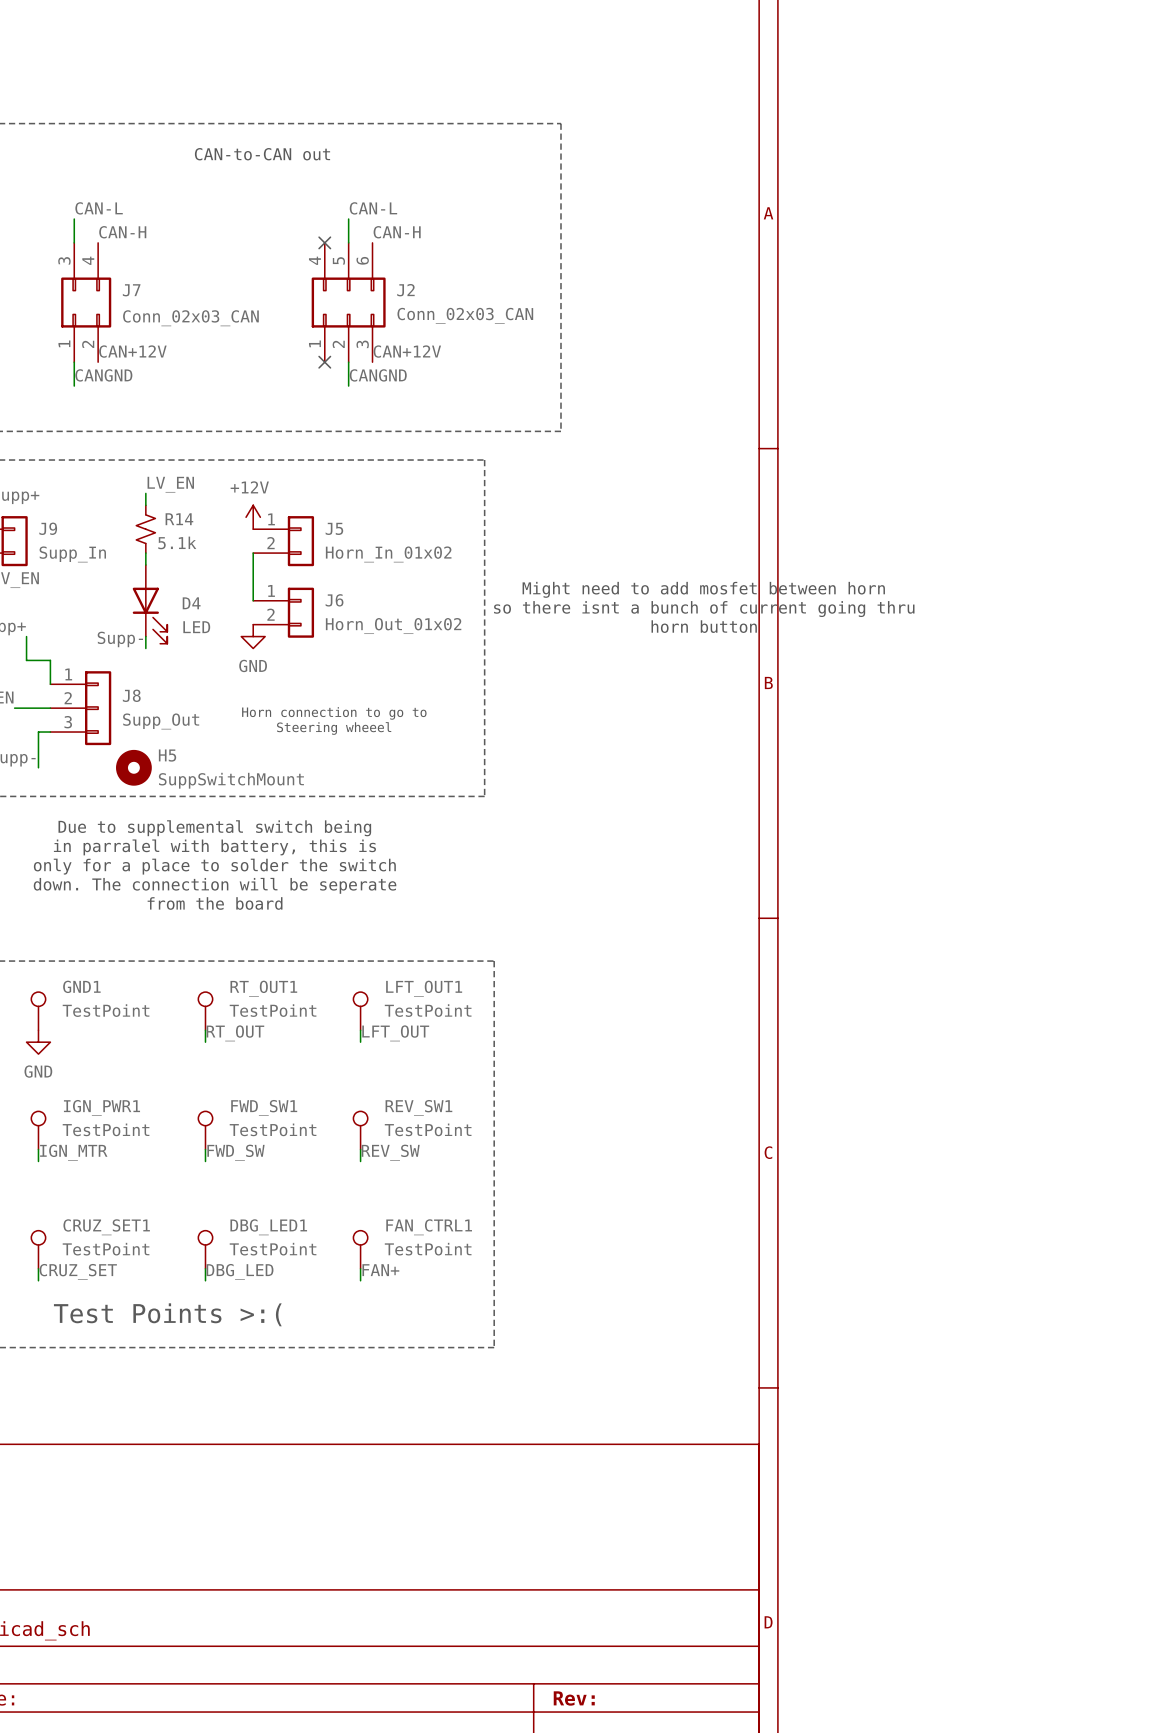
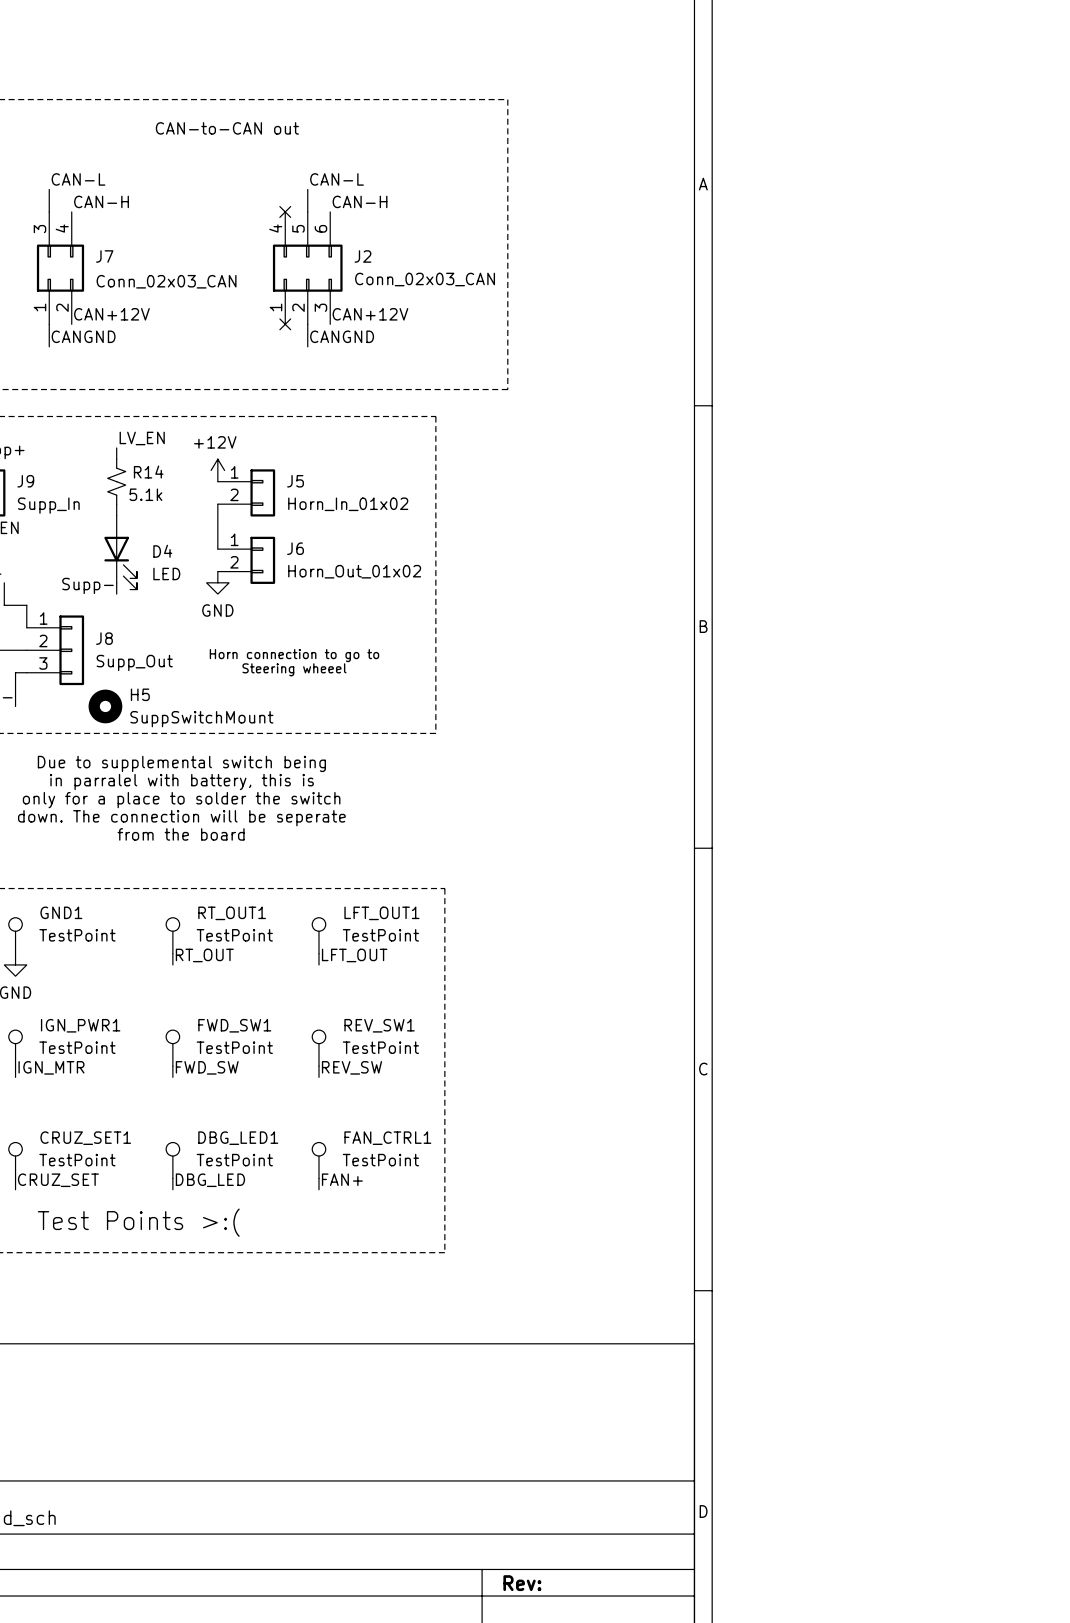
text: Might need to add mosfet between horn (703, 589) -> none
text: so there isnt a bunch of current going thru (704, 609) -> none
text: horn button (704, 626) -> none

